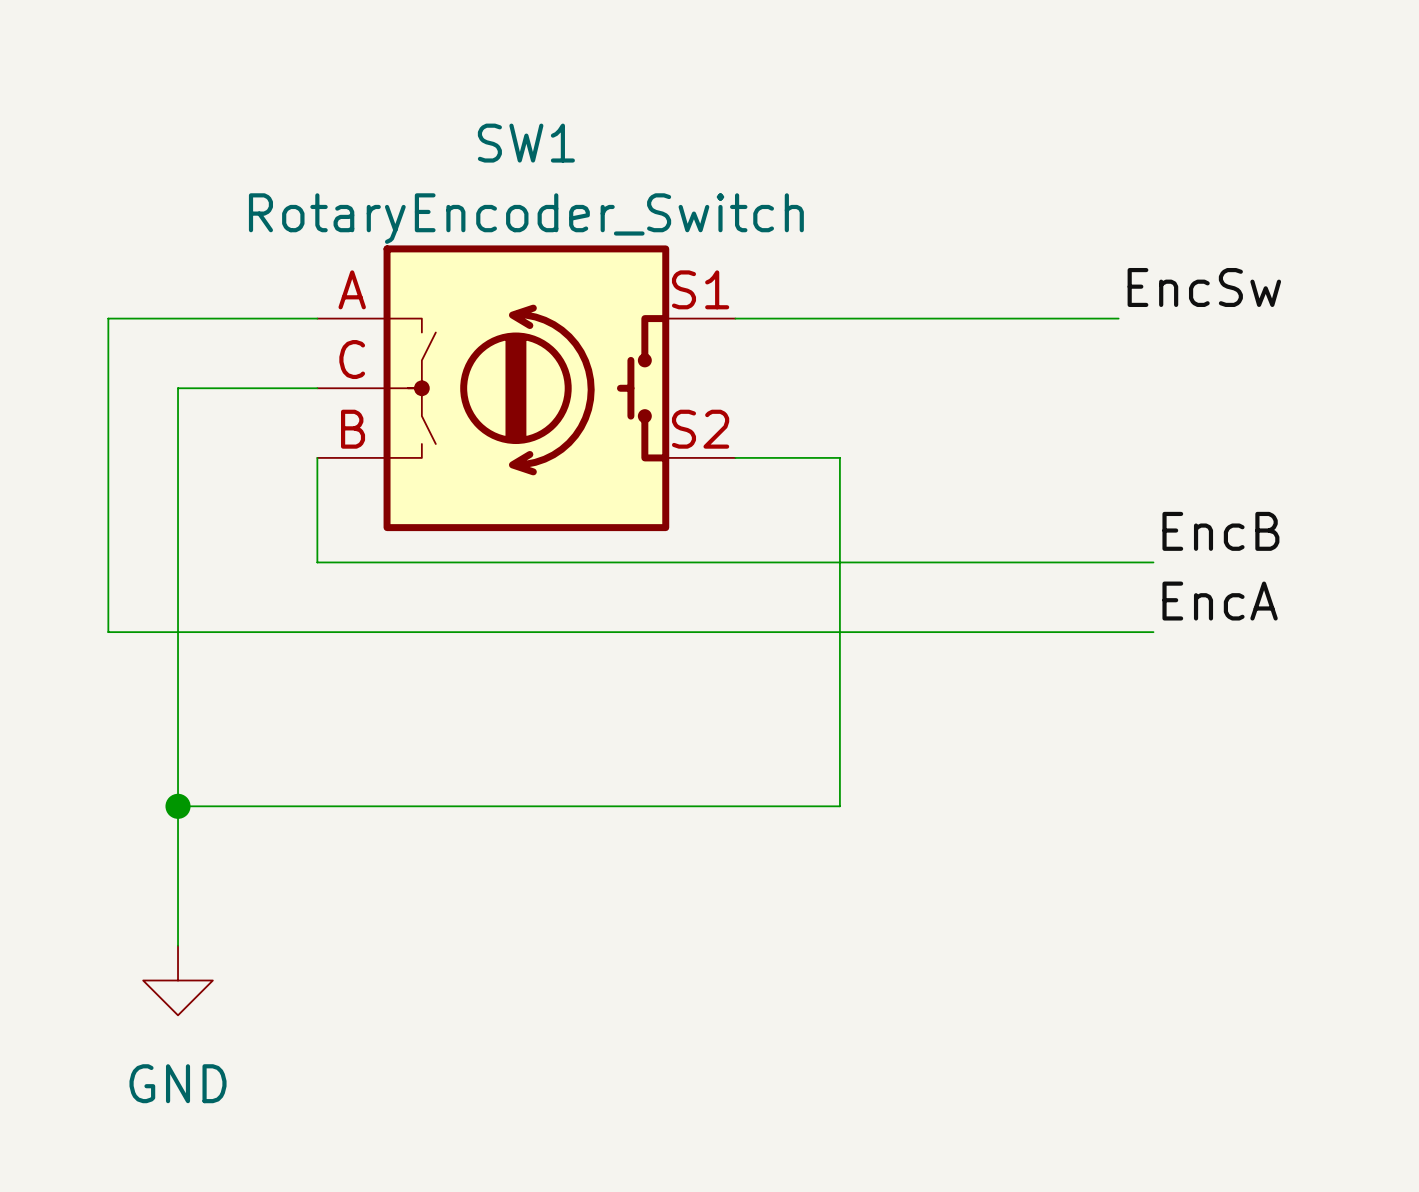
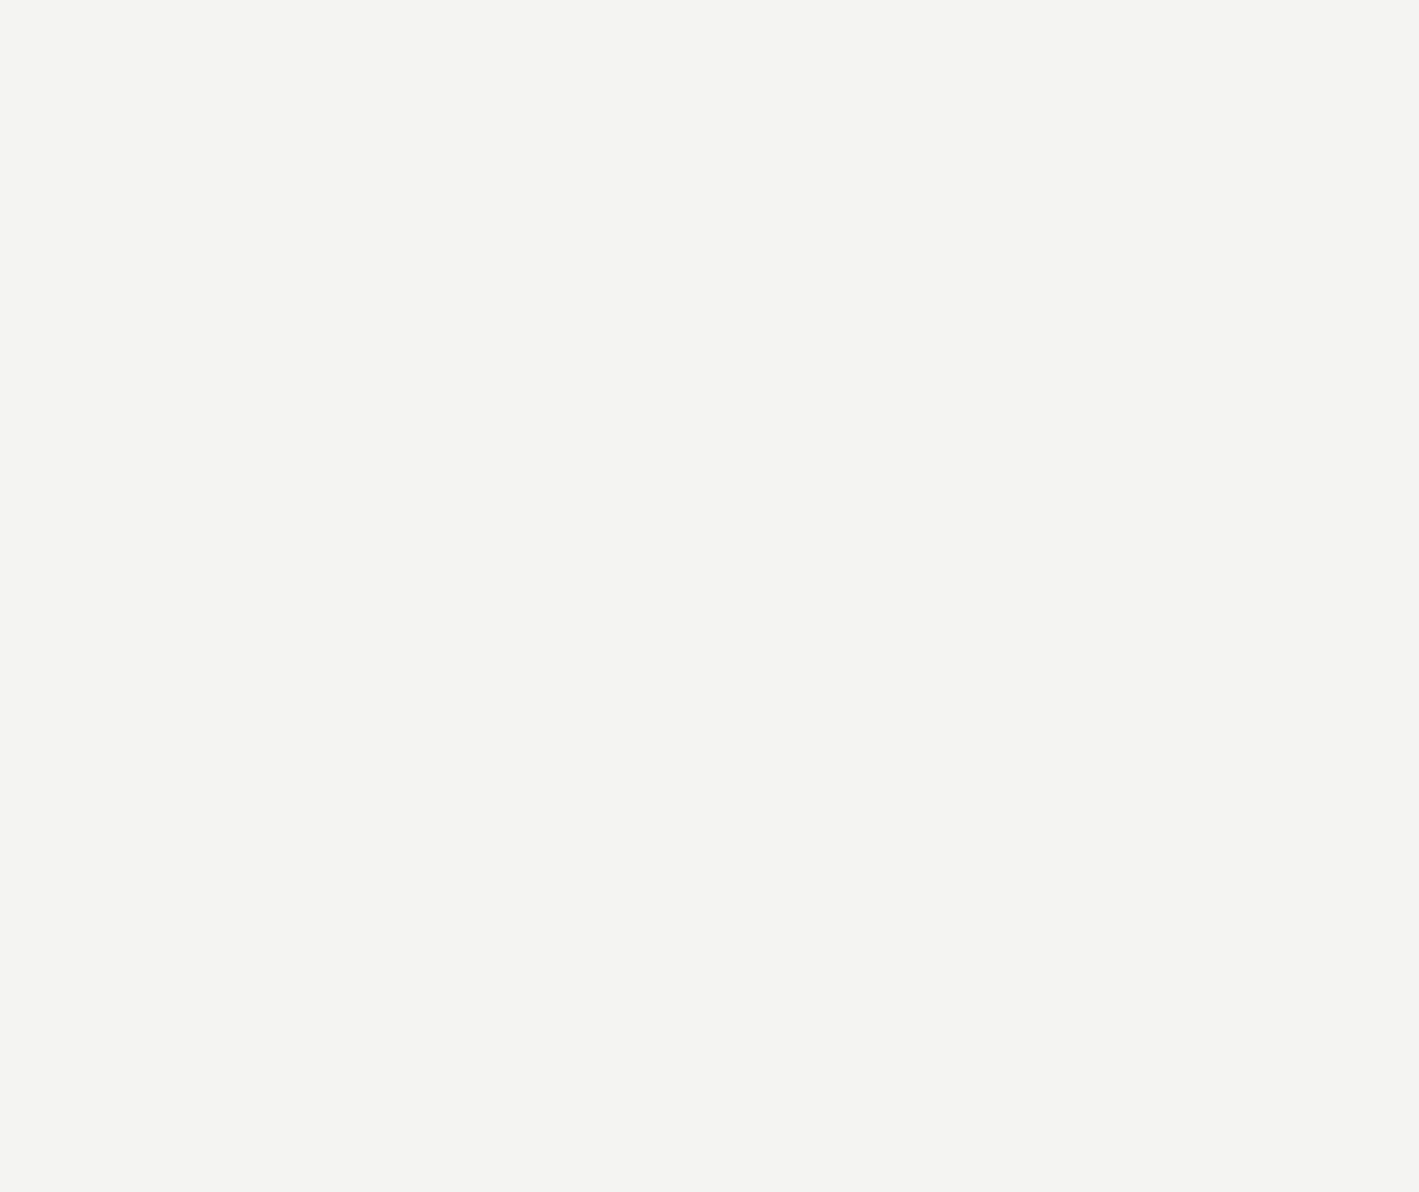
label: EncSw (1204, 287) -> none
wire: (317, 318) (108, 318) (108, 632) (1153, 632) -> none
wire: (735, 318) (1118, 318) -> none
wire: (317, 388) (178, 388) (178, 945) -> none
SW1: RotaryEncoder_Switch (526, 388) -> none
wire: (317, 457) (317, 562) (1153, 562) -> none
wire: (735, 457) (839, 457) (839, 806) (178, 806) -> none
label: EncB (1220, 531) -> none
label: EncA (1220, 601) -> none
junction: (178, 806) -> none
power symbol: GND (178, 980) -> none

